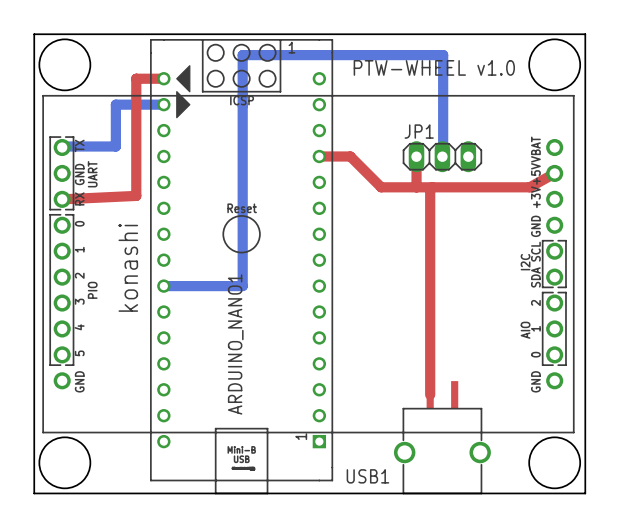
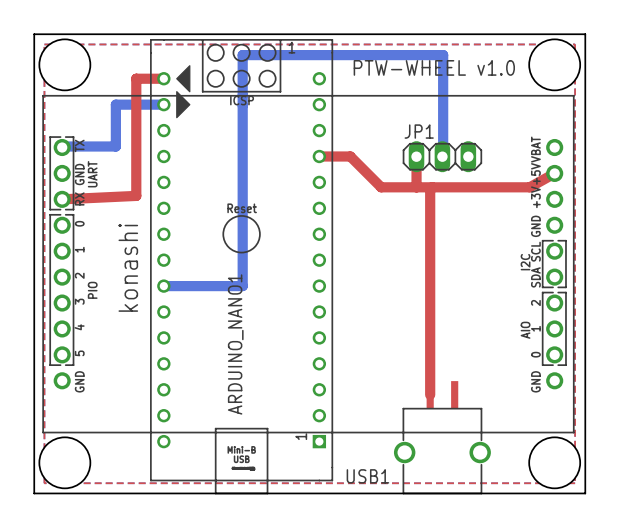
top zone outline: none -> (44, 44) (575, 44) (575, 483) (44, 483) (44, 44)

